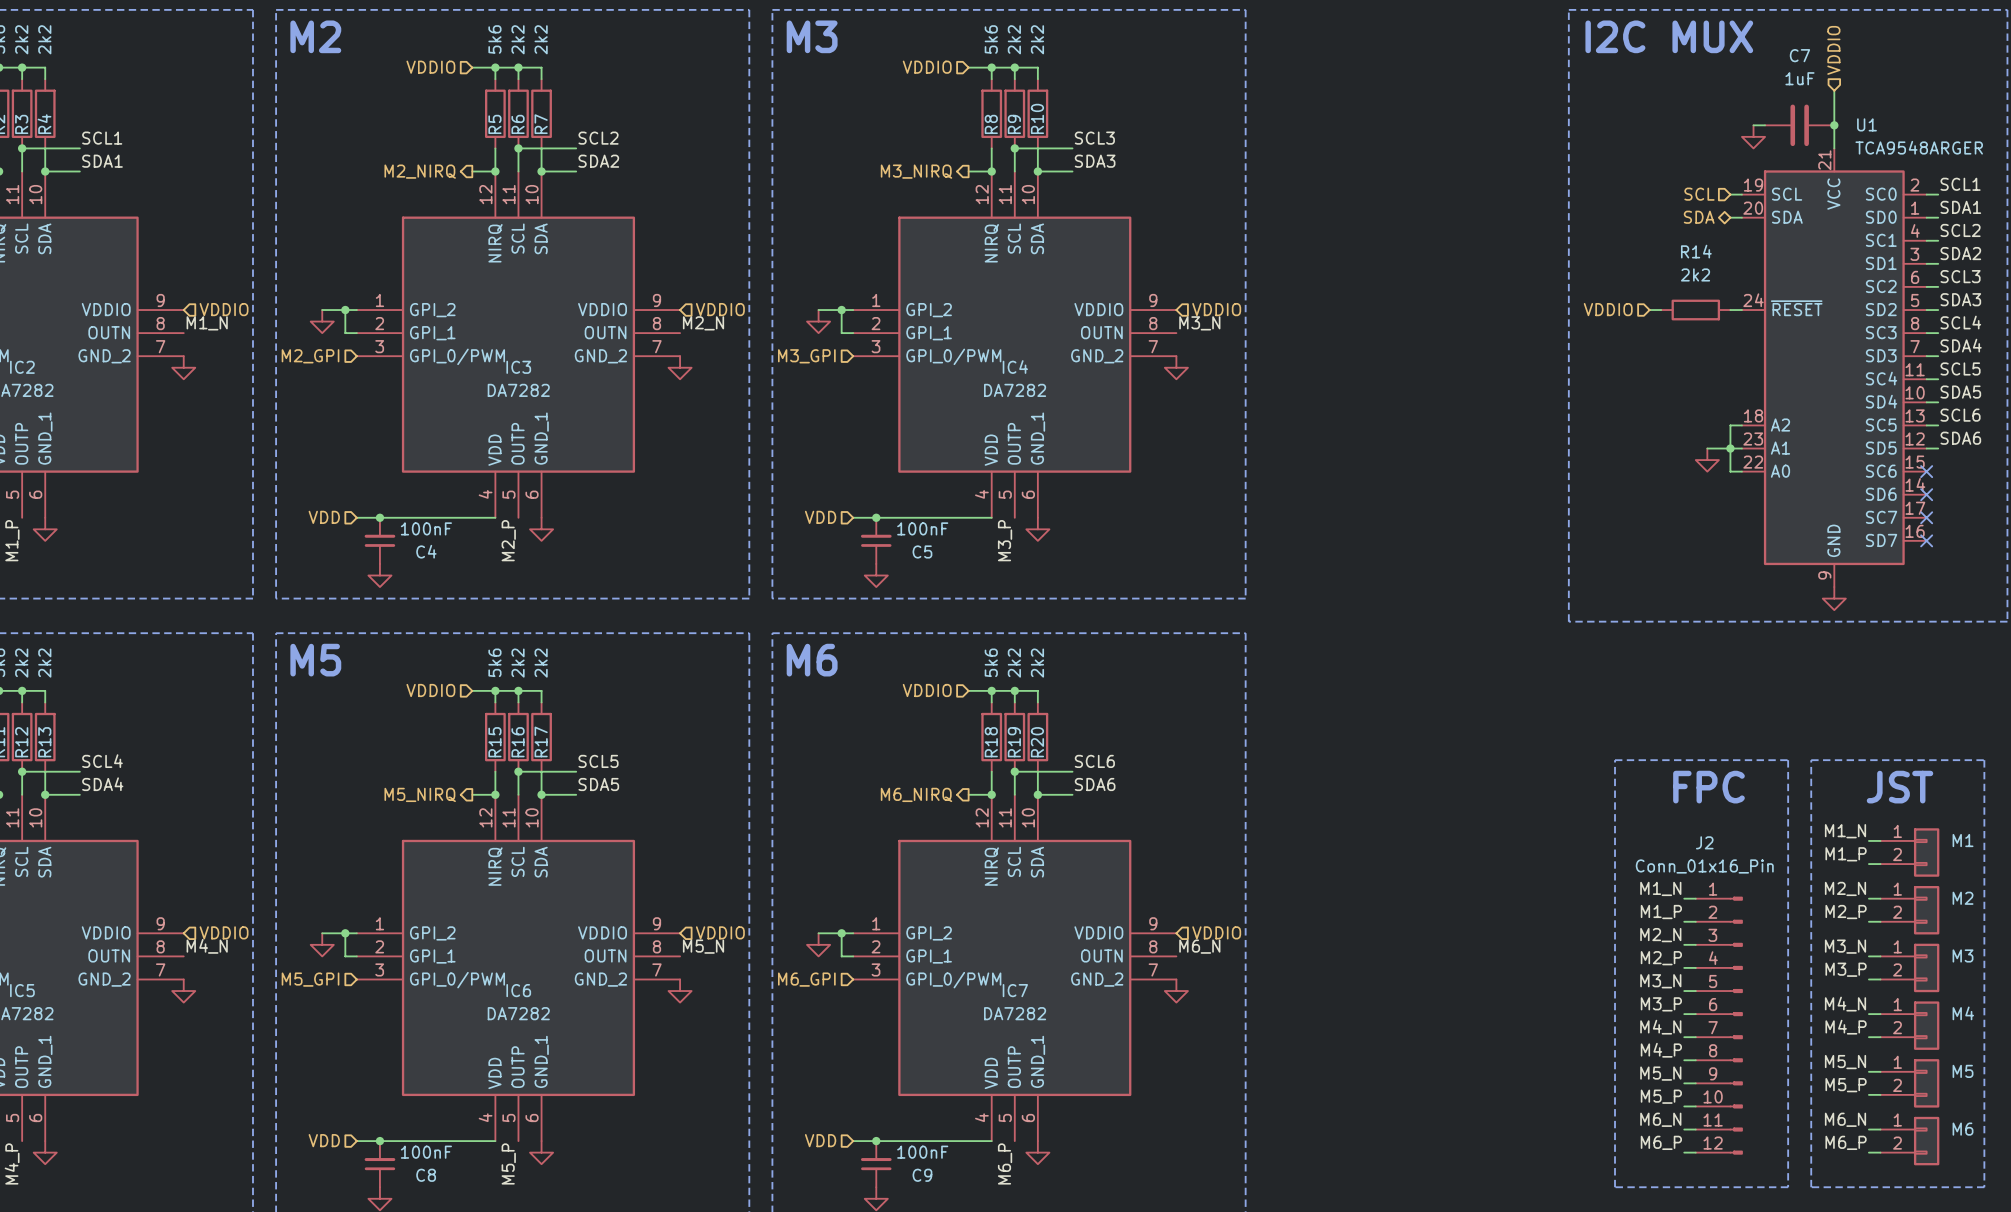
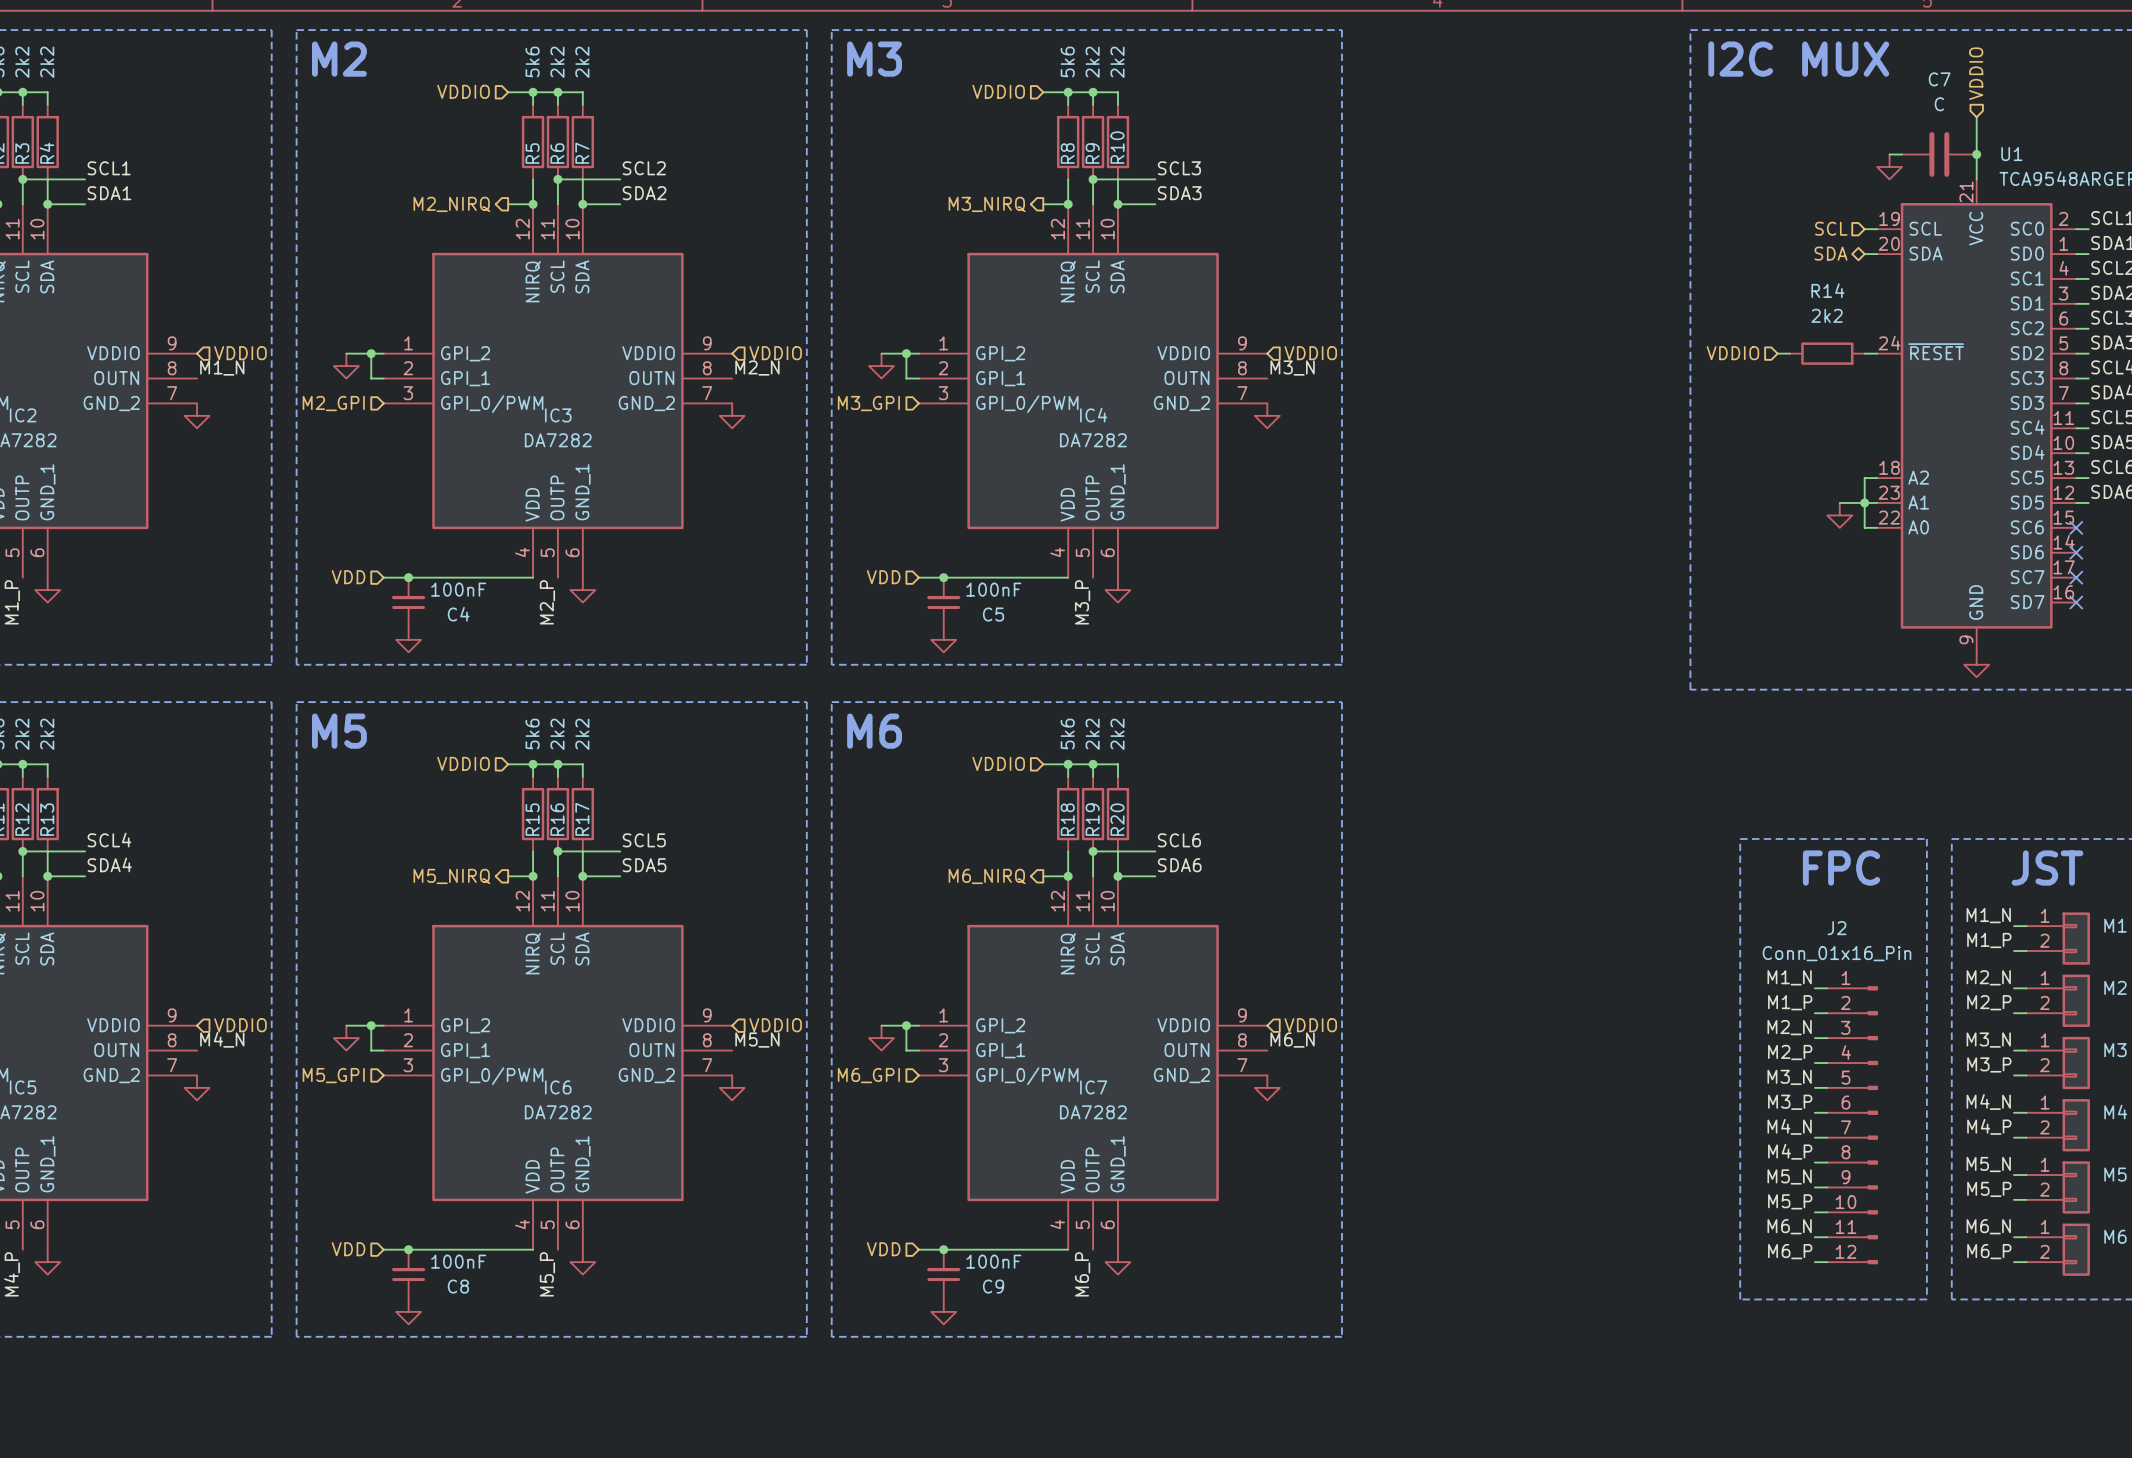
C7 value: 1uF (1799, 78) -> C (1939, 104)

